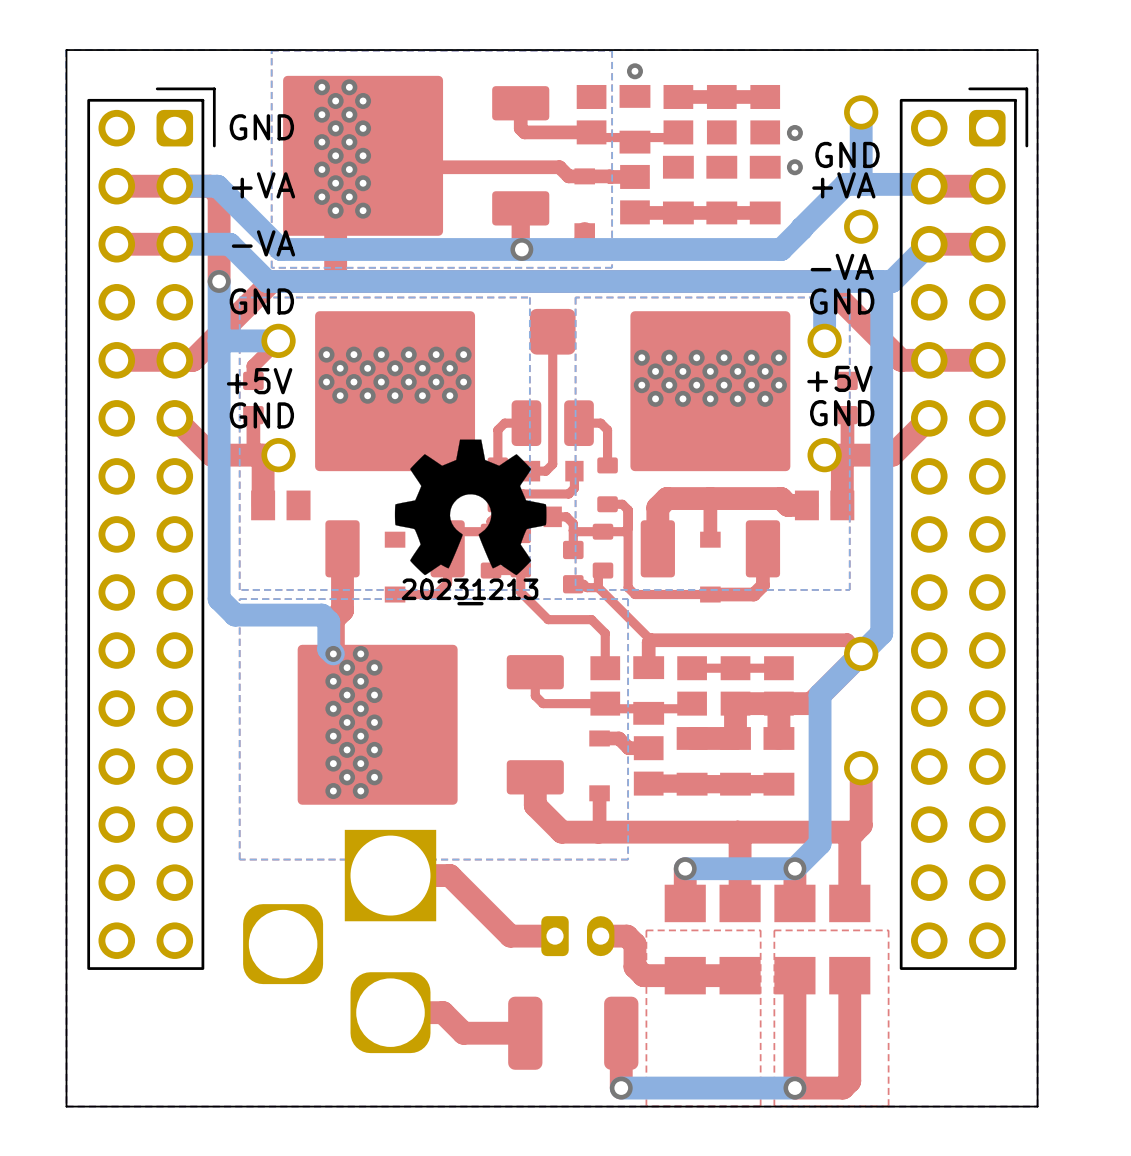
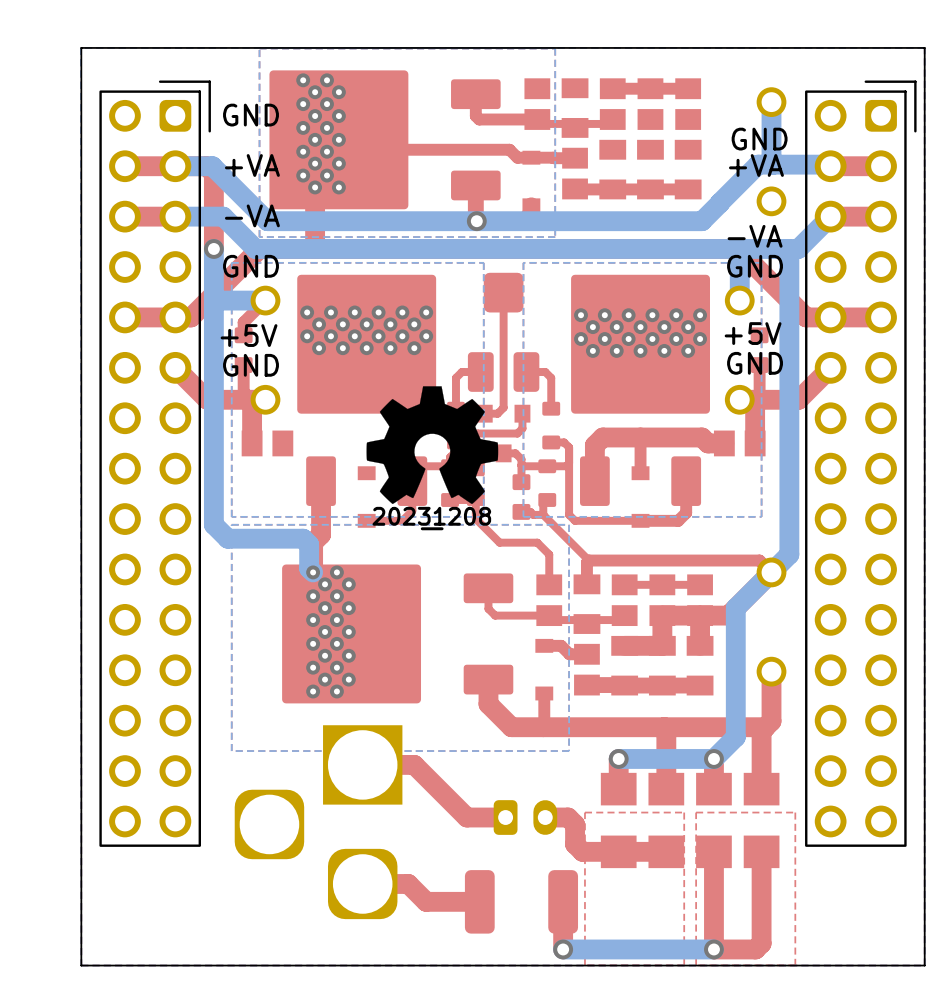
via: (634, 71) -> none
via: (794, 132) -> none
via: (794, 167) -> none
drawing shape: [401, 578, 539, 606] -> [372, 506, 492, 531]

